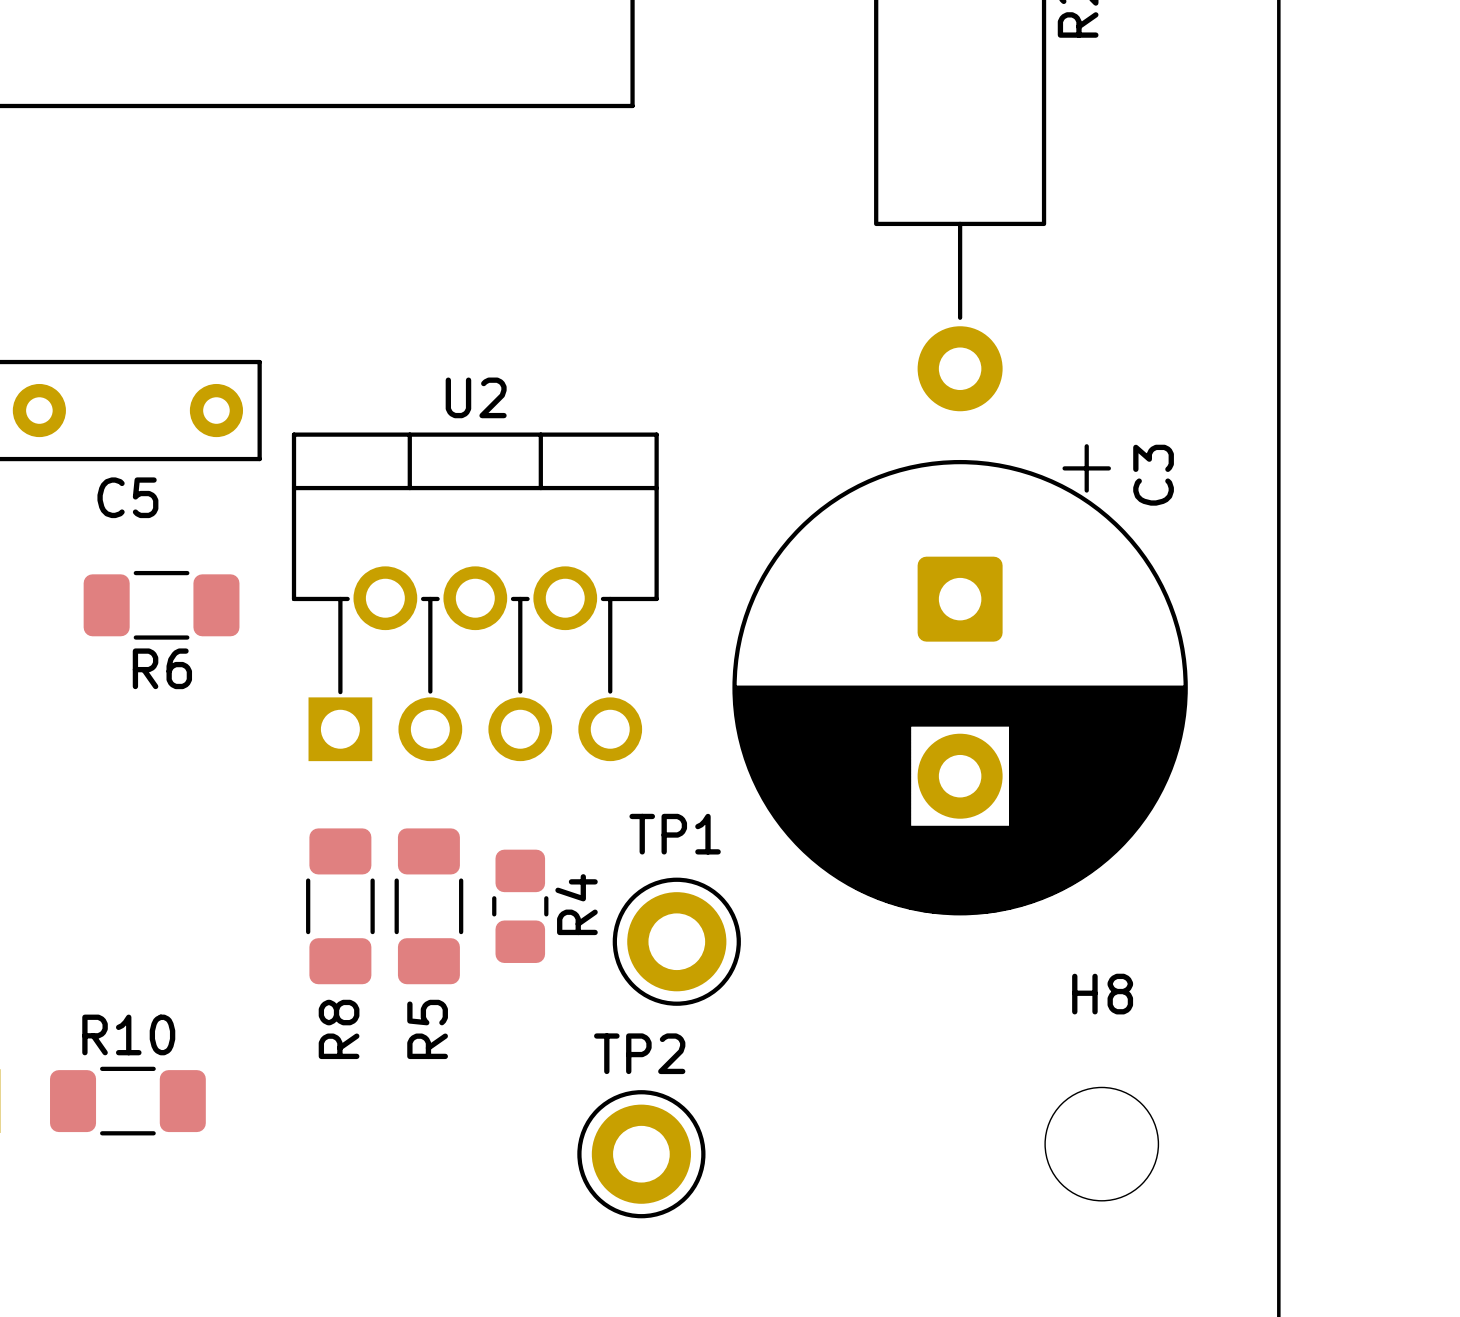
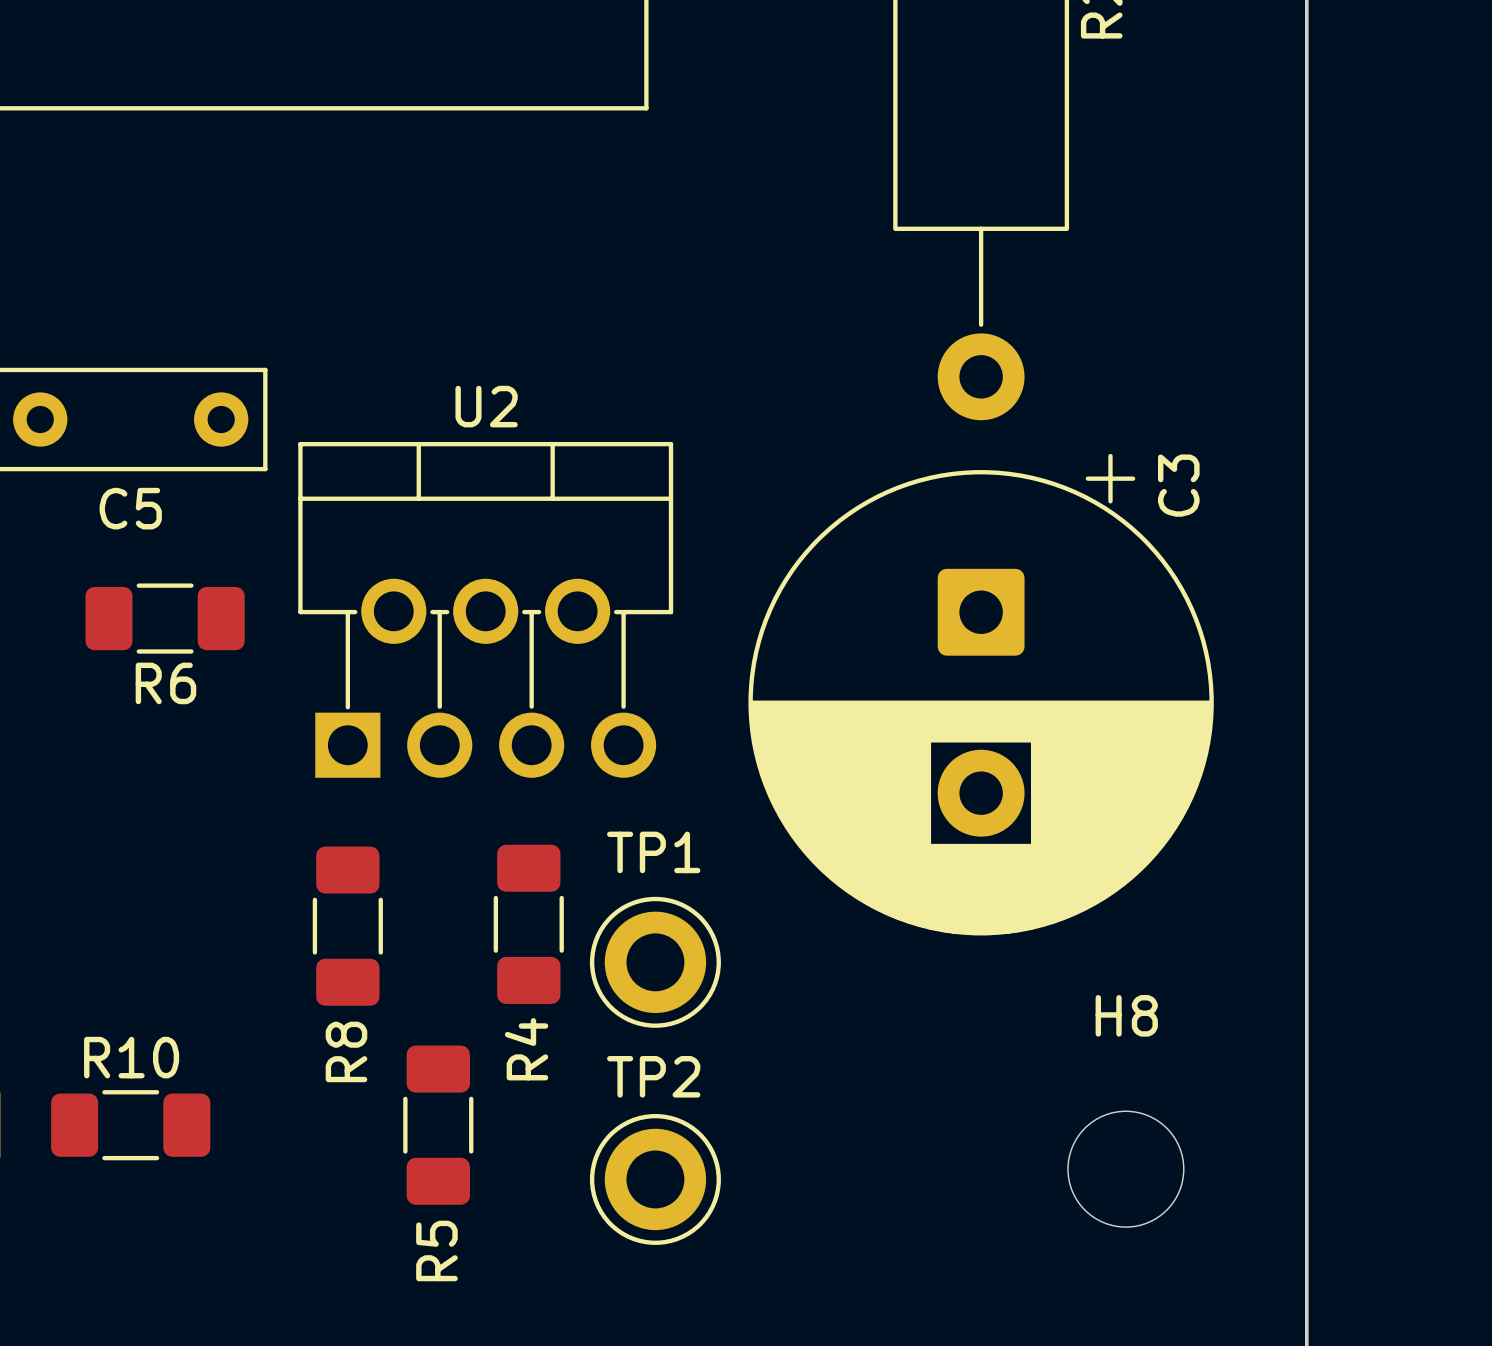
R4 footprint: [492, 849, 549, 963] -> [493, 844, 564, 1004]
R4 name position: R4 (576, 904) -> R4 (526, 1049)
R5 position: (428, 906) -> (438, 1125)
TP1 position: (676, 941) -> (655, 962)

